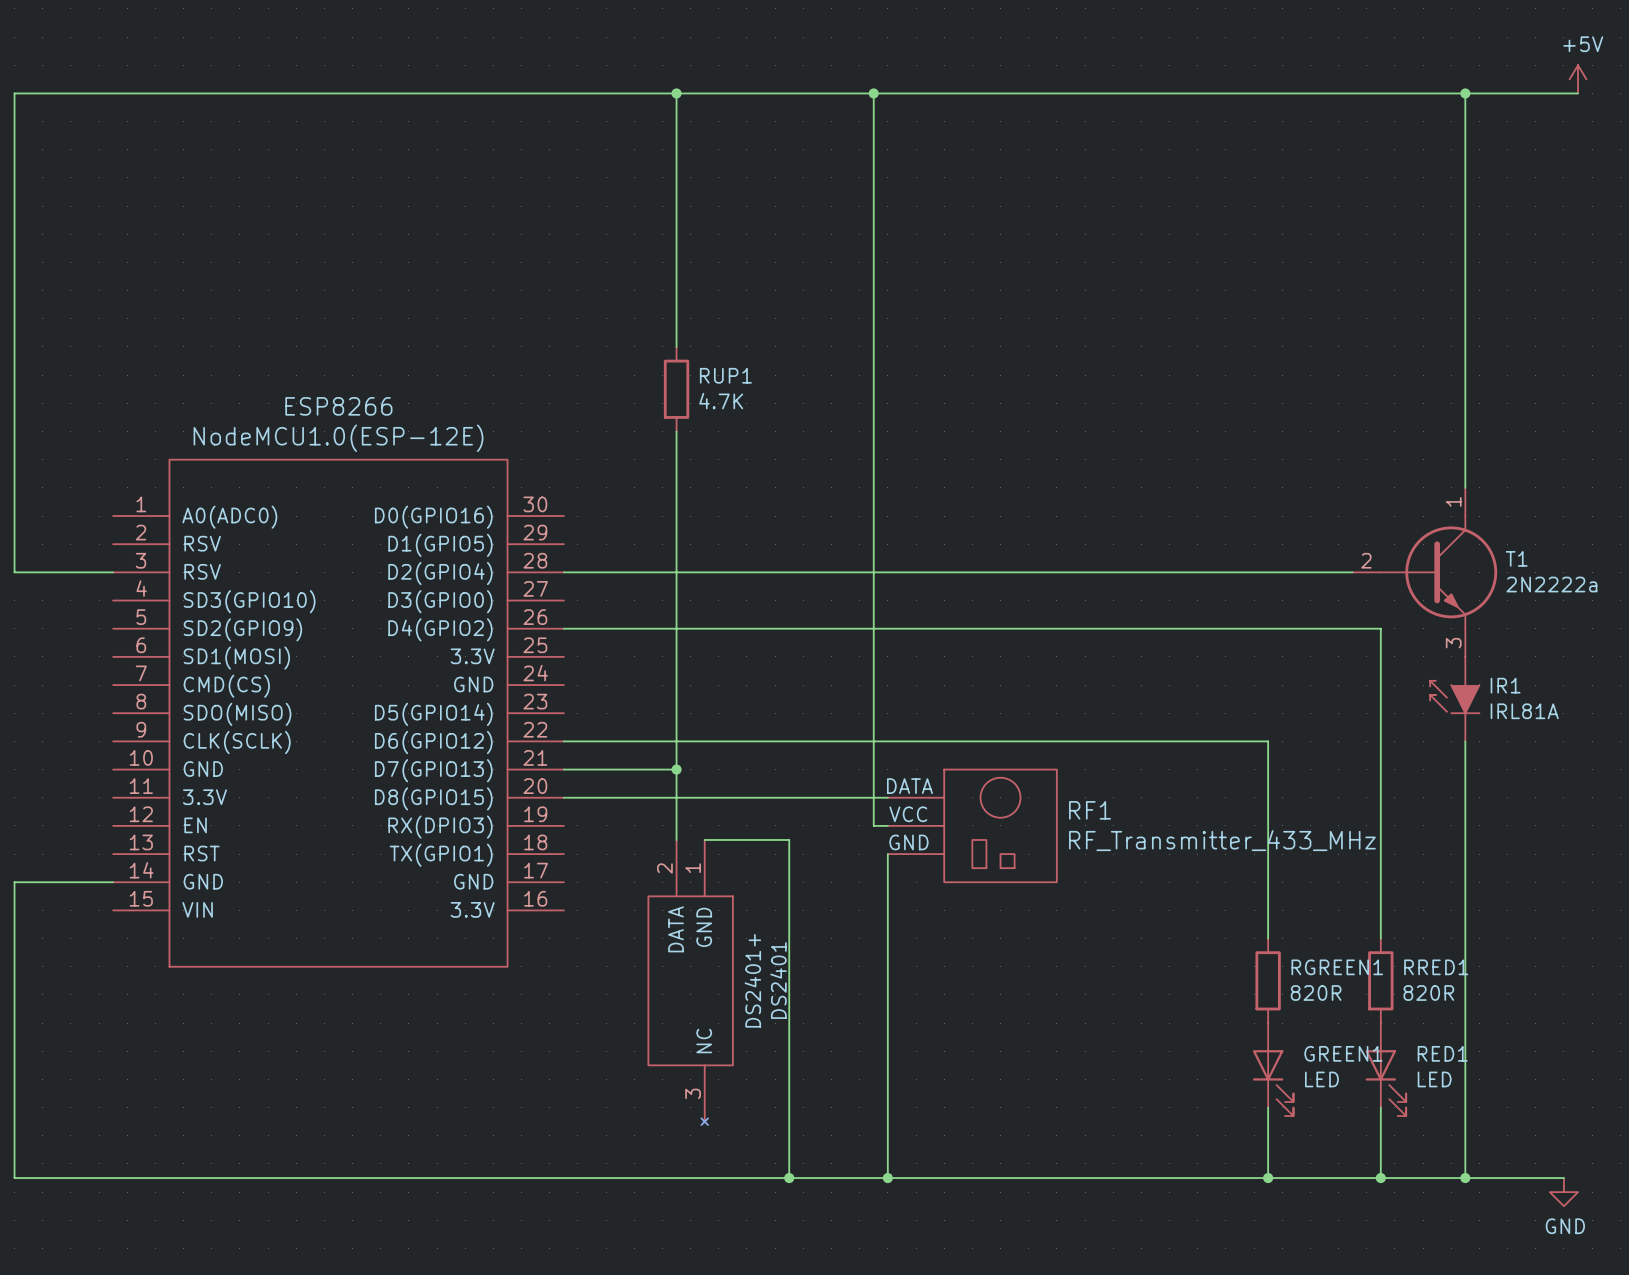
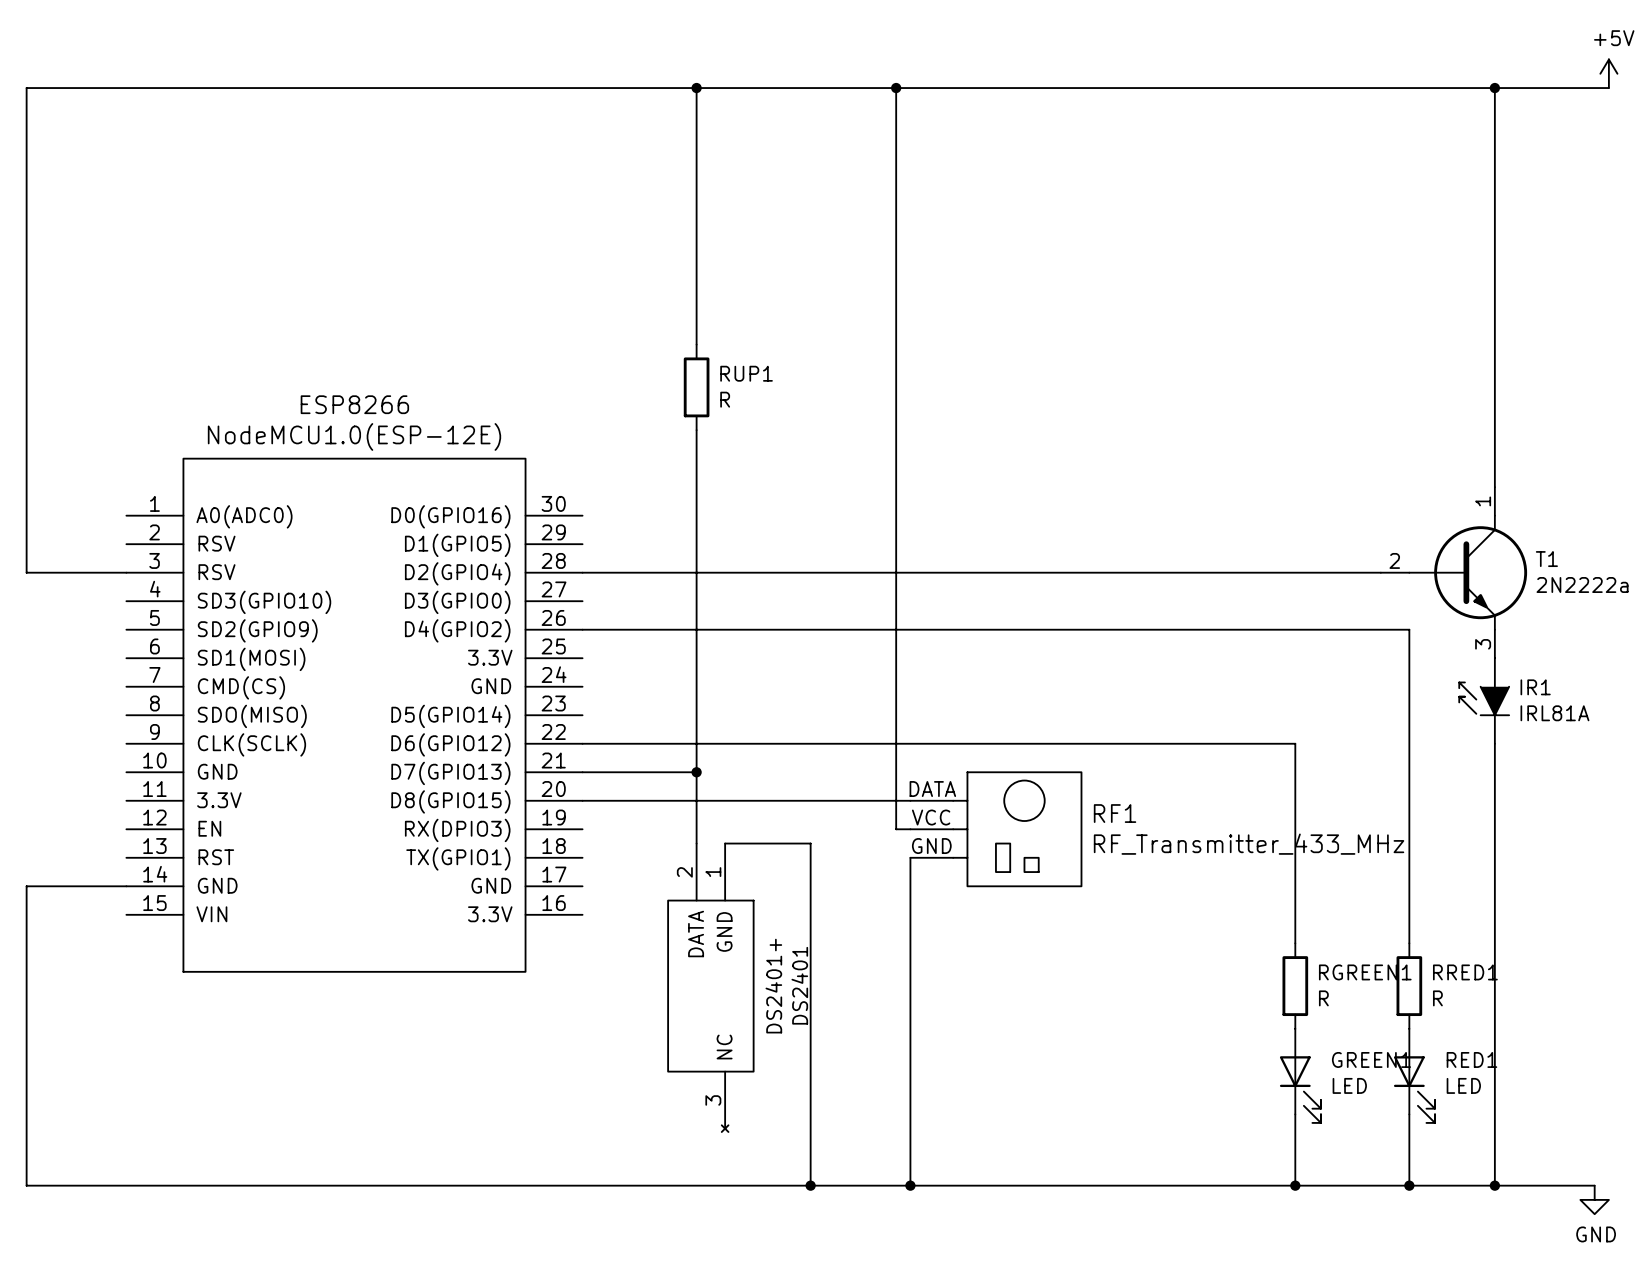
RUP1 value: 4.7K (721, 401) -> R (725, 399)
RGREEN1 value: 820R (1316, 992) -> R (1323, 998)
RRED1 value: 820R (1428, 992) -> R (1437, 998)

